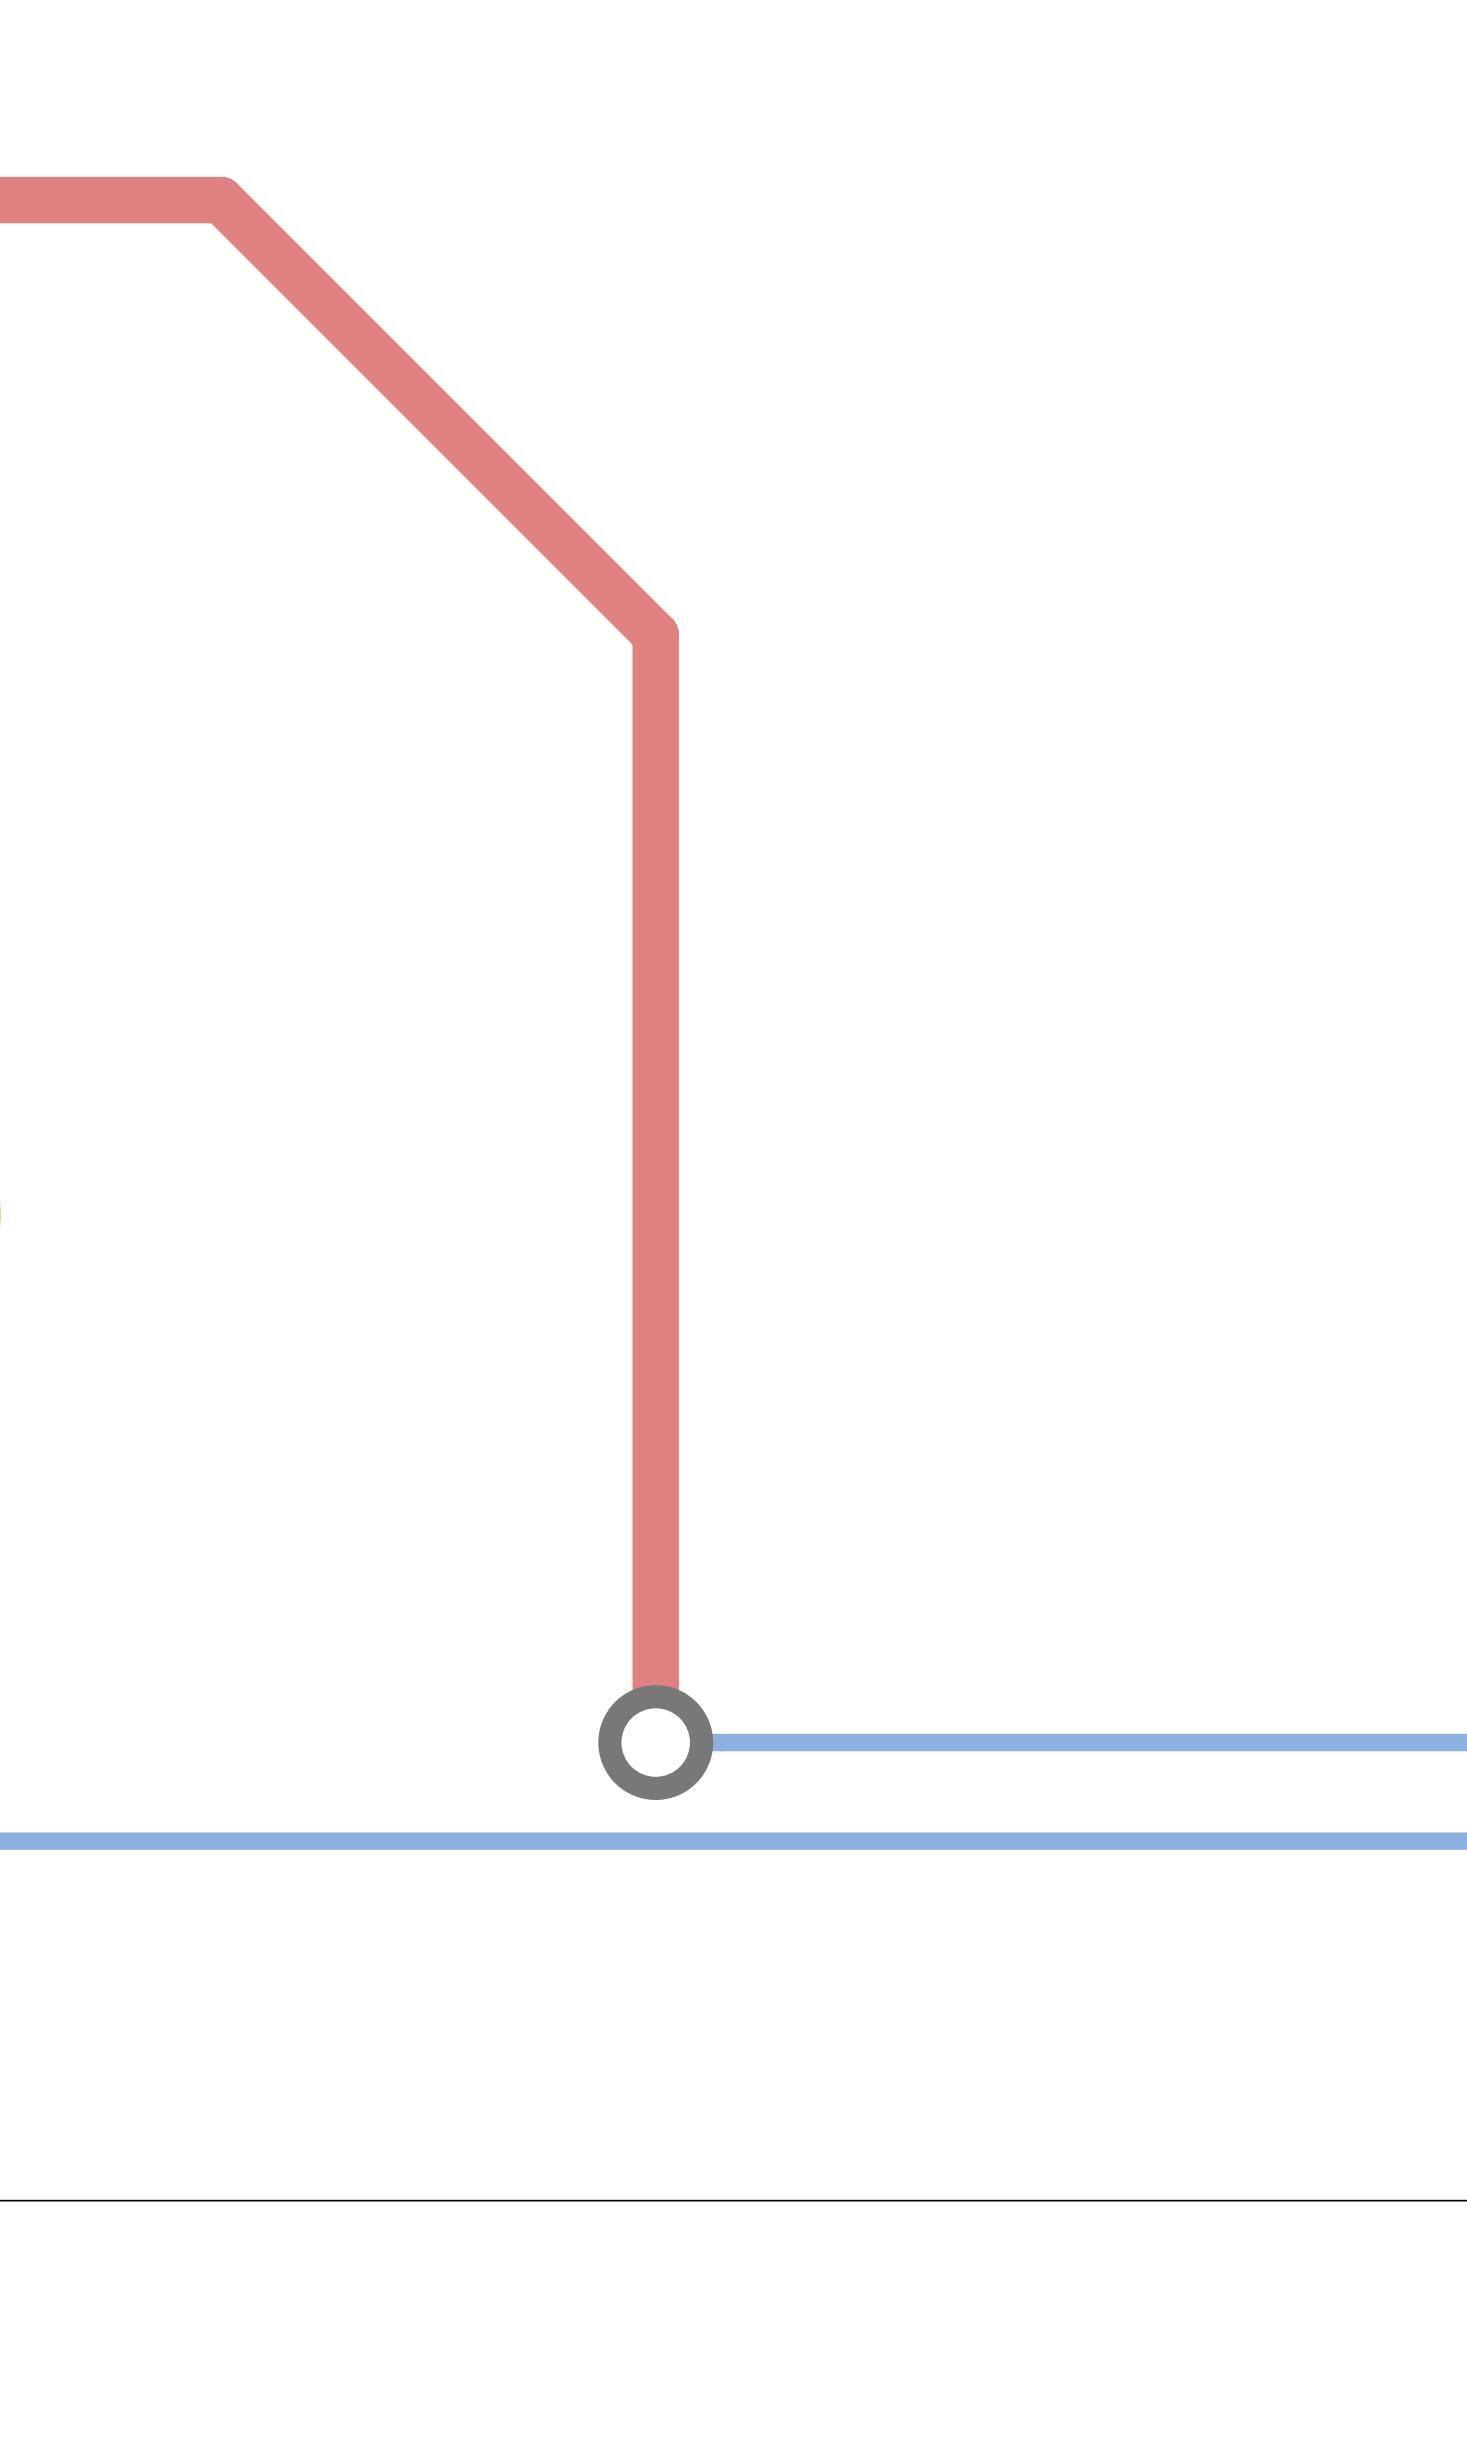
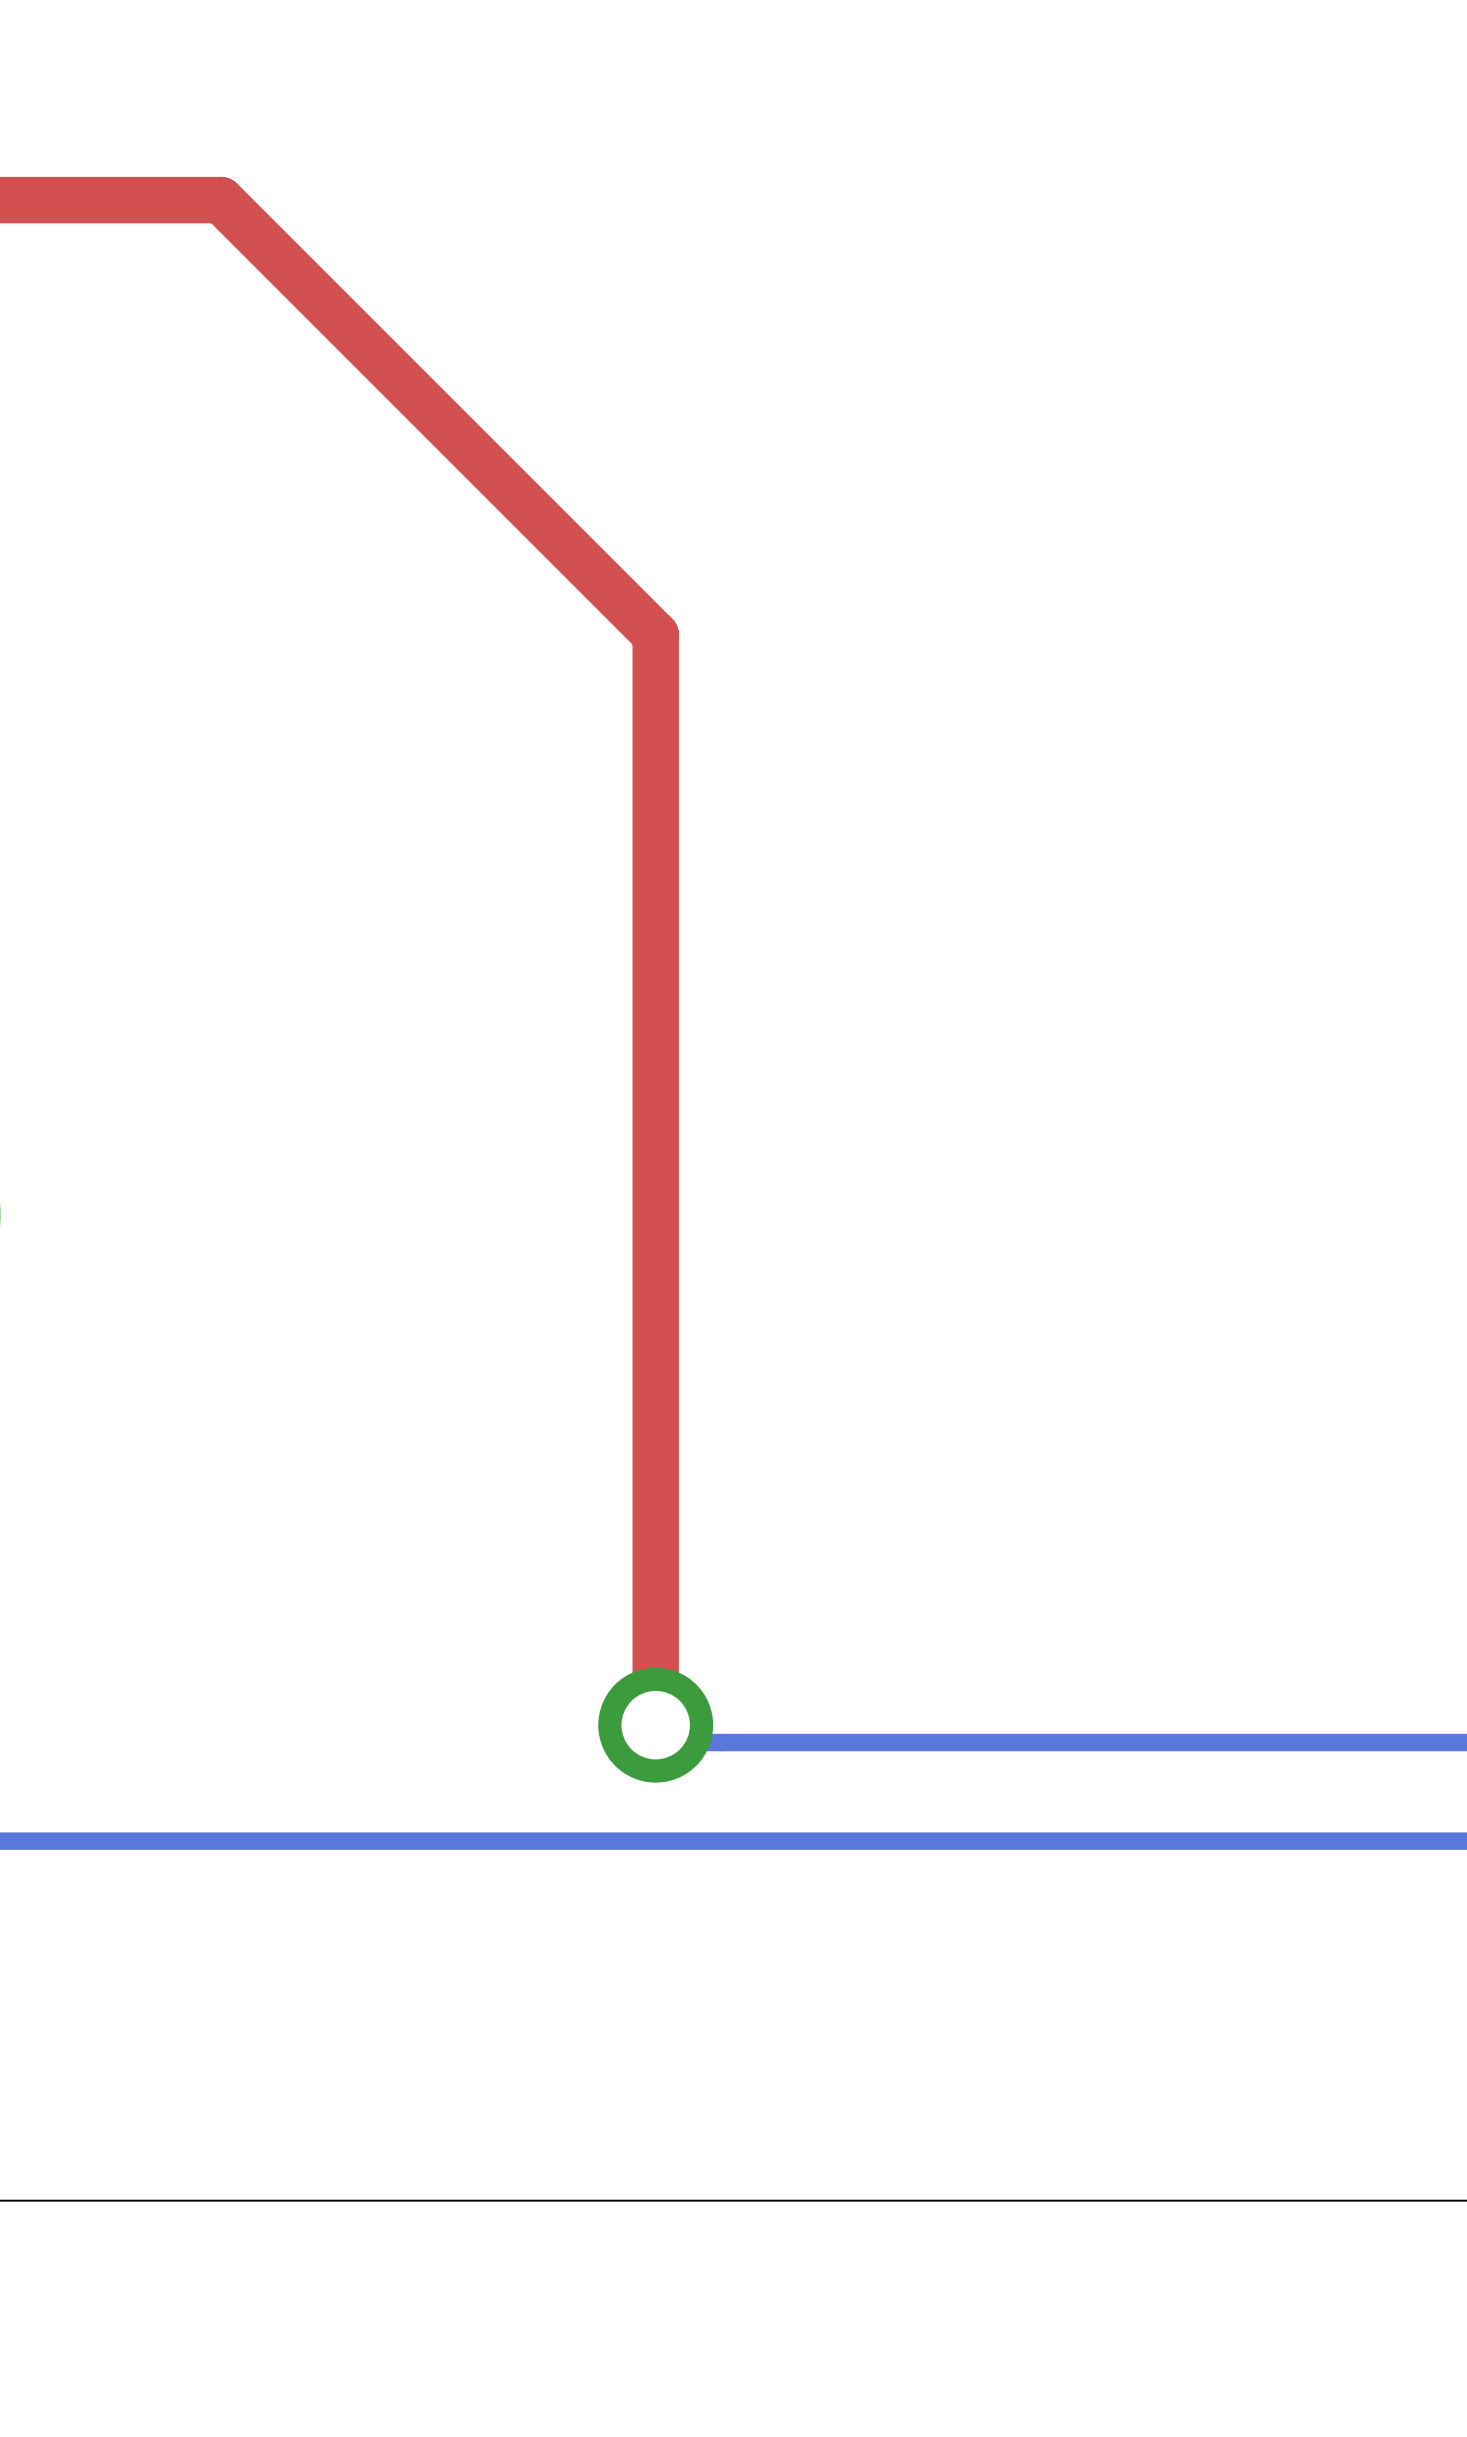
via position: (655, 1742) -> (655, 1725)

